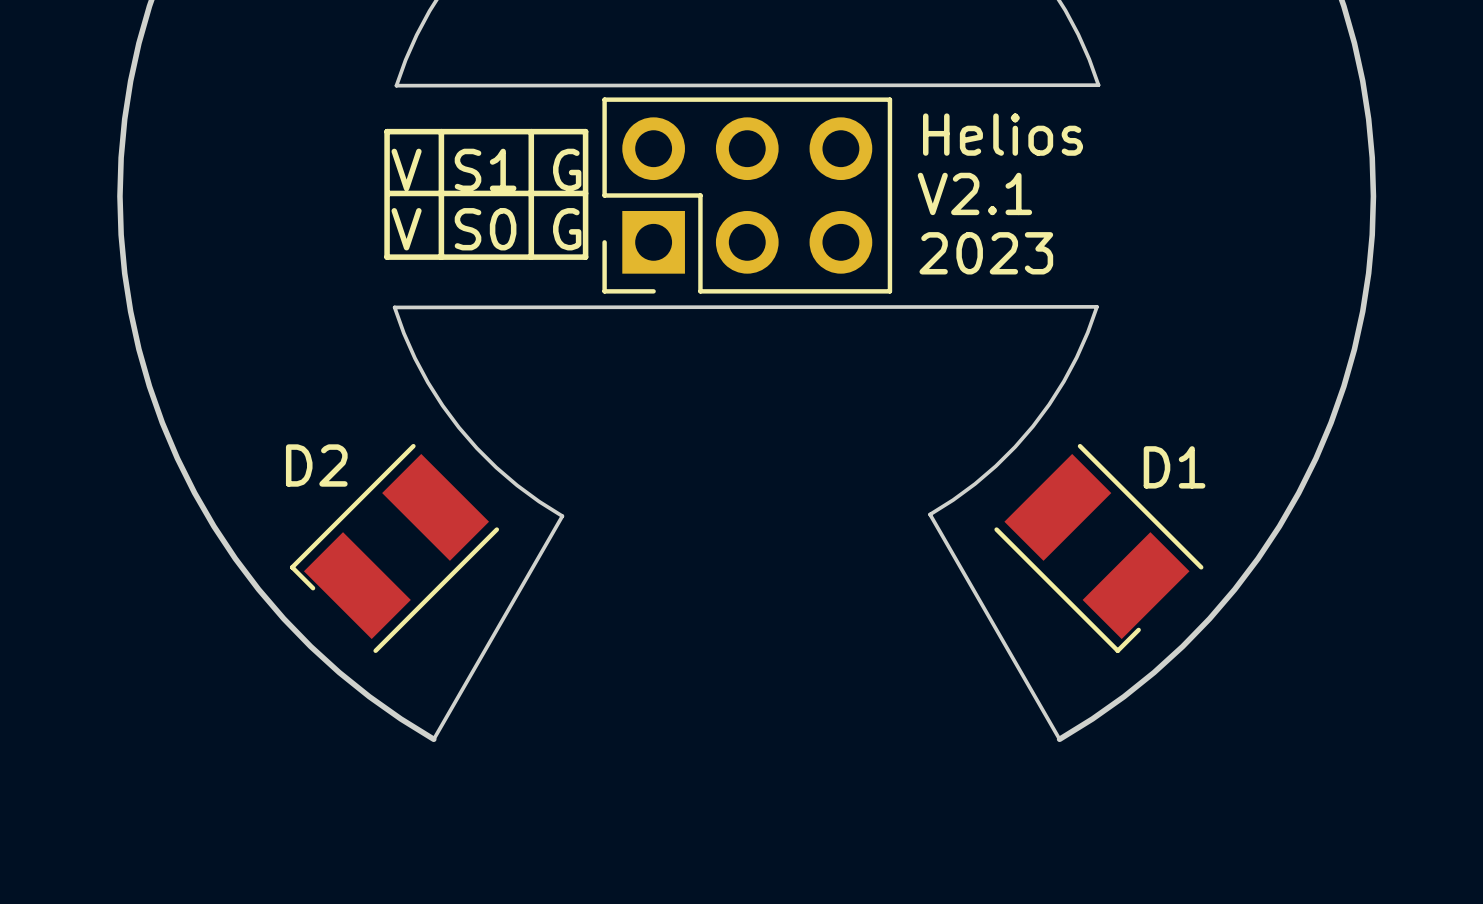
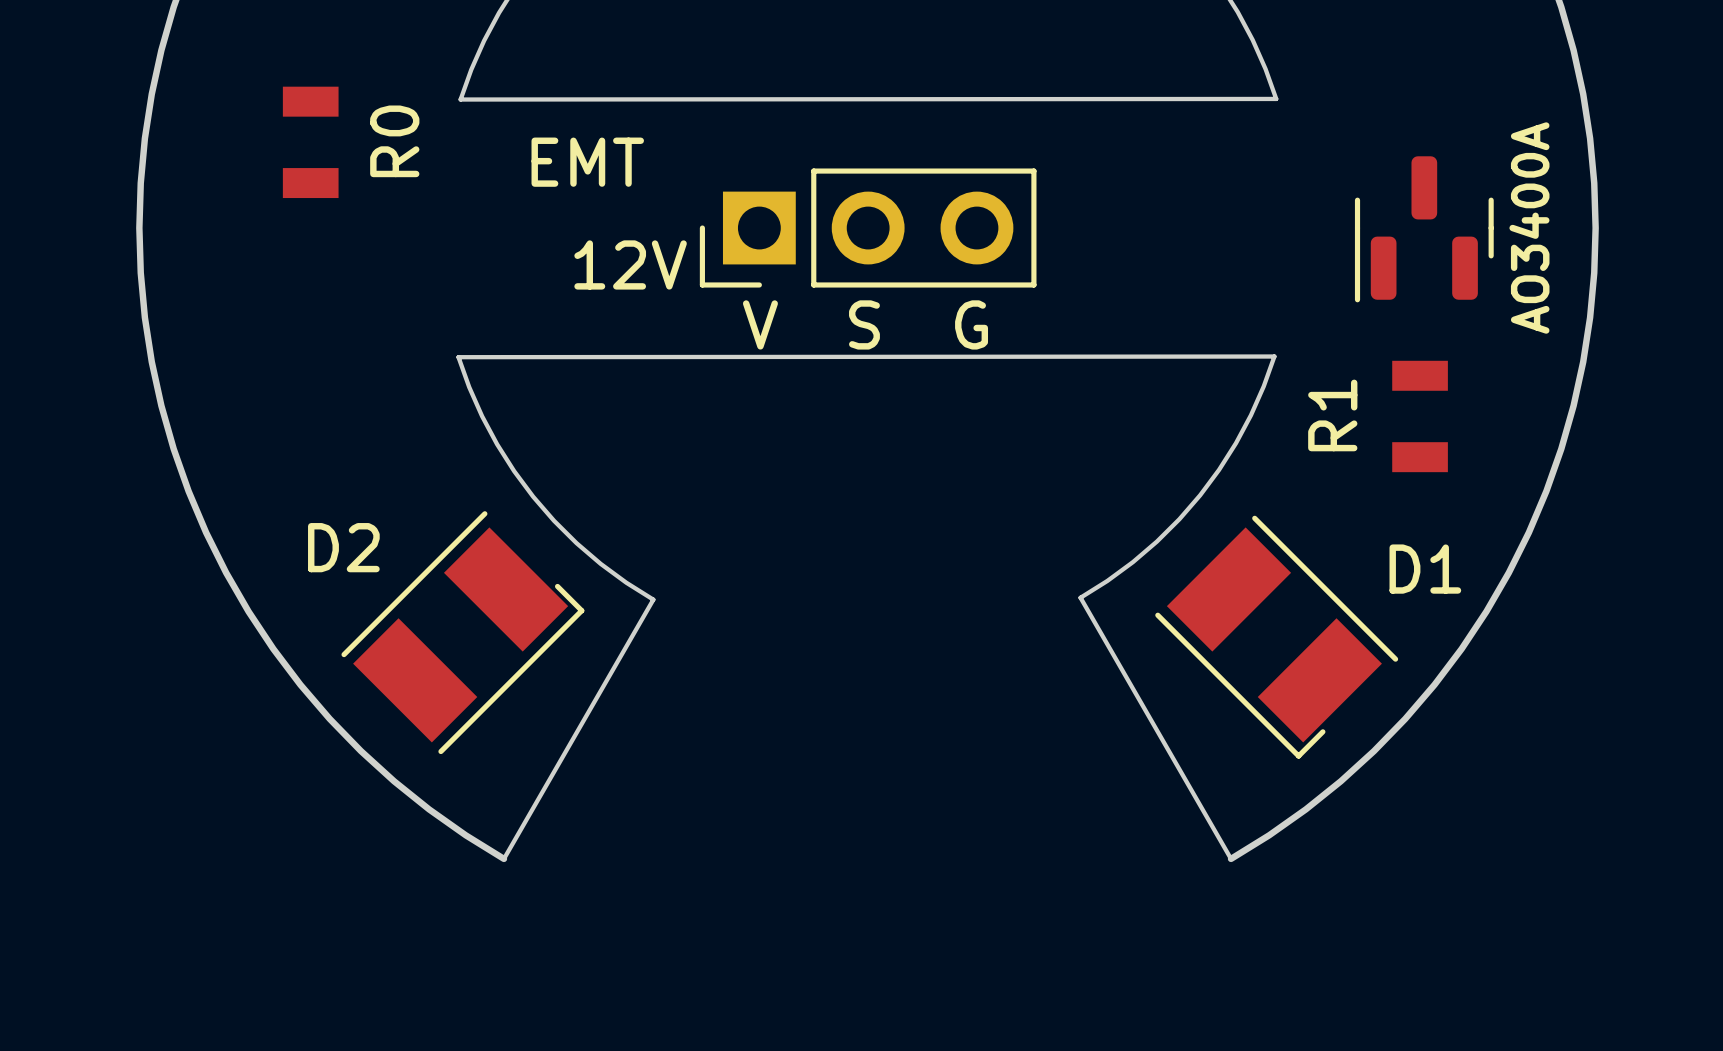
part footprint: [602, 97, 893, 294] -> [699, 168, 1037, 288]
R0: none -> (310, 142)
line: (387, 131) (585, 131) (585, 257) (387, 257) (387, 131) -> none
line: (441, 131) (441, 257) -> none
line: (531, 131) (531, 257) -> none
text: Helios (1003, 134) -> none
text: none -> EMT (587, 162)
text: V S1 G (486, 169) -> none
line: (388, 193) (585, 193) -> none
text: V2.1 (974, 193) -> none
part: none -> AO3400A (1424, 229)
text: none -> 12V (630, 264)
text: V S0 G (486, 229) -> none
text: 2023 (986, 253) -> none
text: none -> V S G (865, 324)
R1: none -> (1420, 416)
D1 name position: D1 (1174, 467) -> D1 (1425, 569)
D2 rotation: 0° (394, 548) -> 180° (462, 632)

